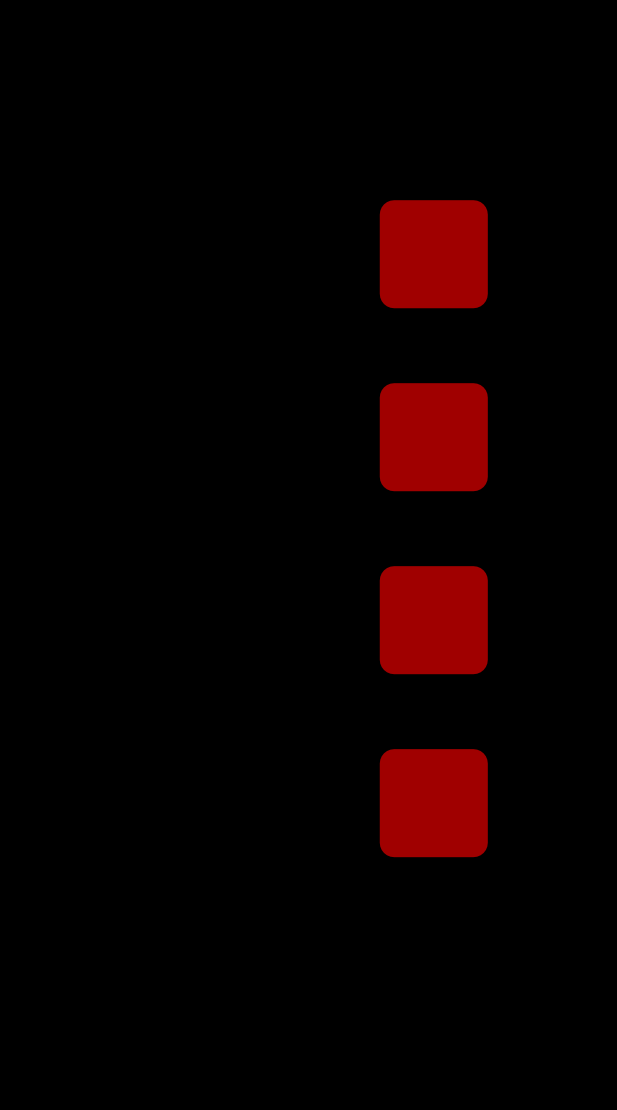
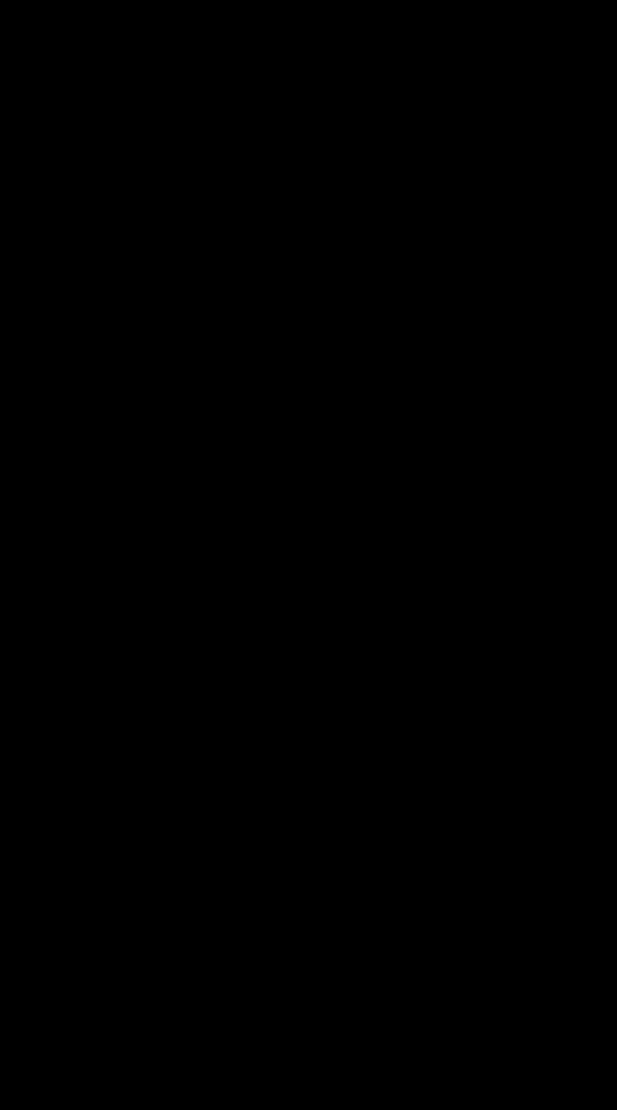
part: (433, 254) -> none
part: (433, 437) -> none
part: (433, 620) -> none
part: (433, 803) -> none

